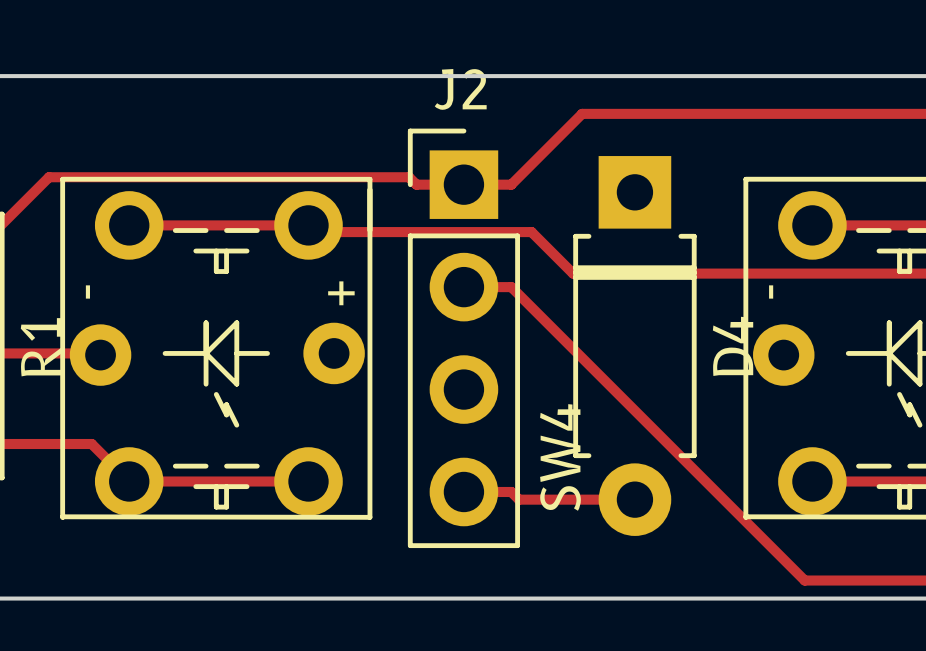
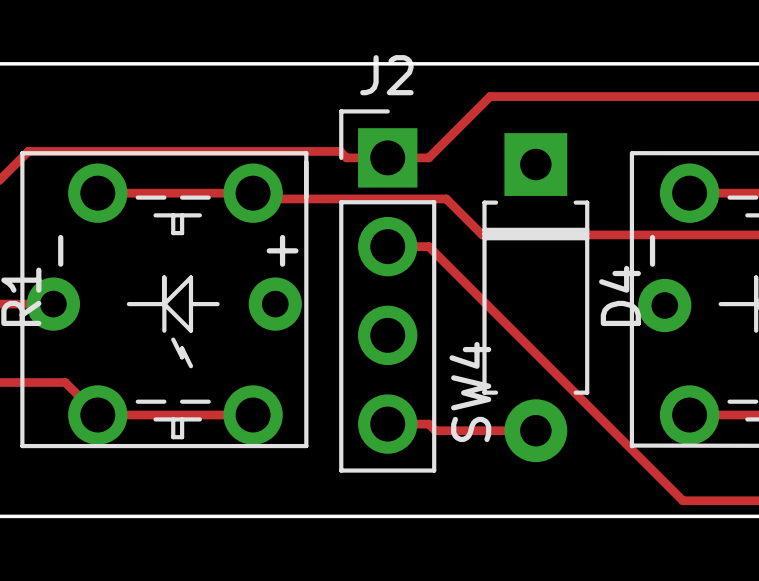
part footprint: [60, 176, 373, 521] -> [20, 151, 309, 449]

